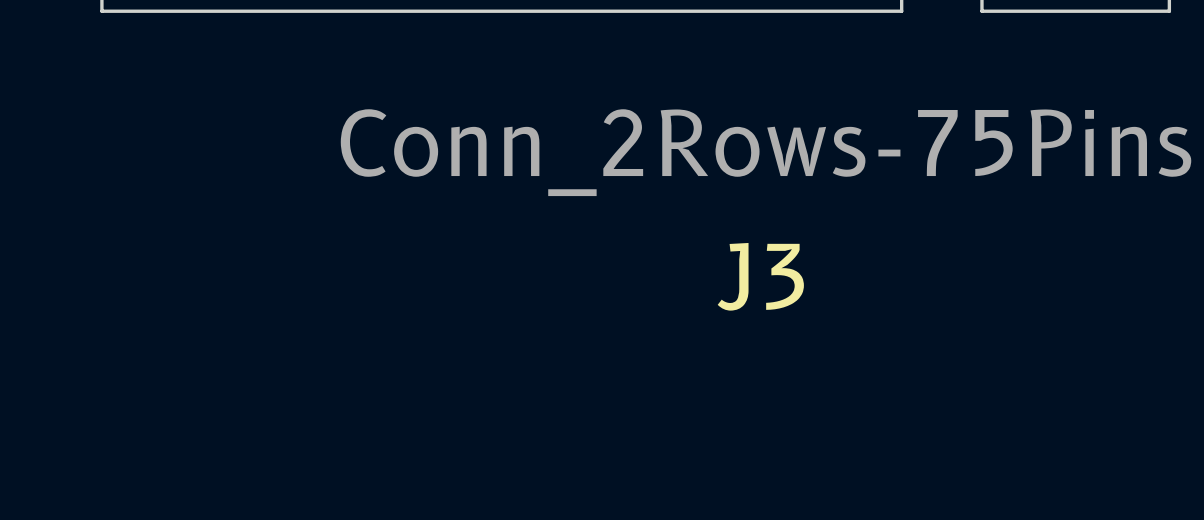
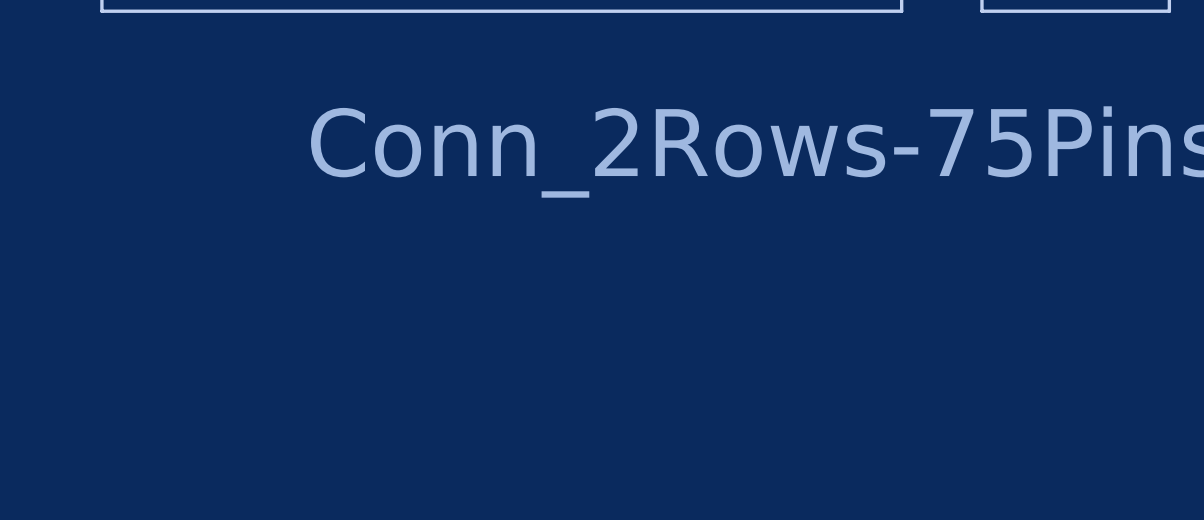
J3 name: J3 (760, 276) -> none

